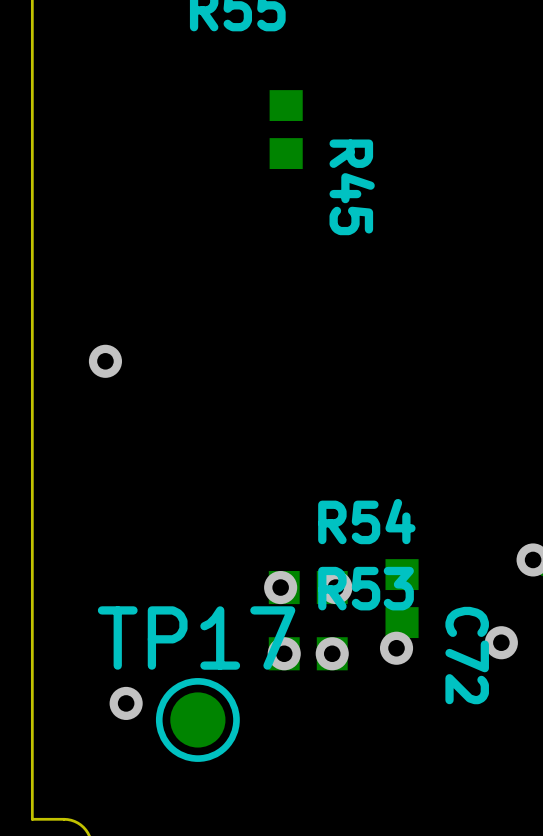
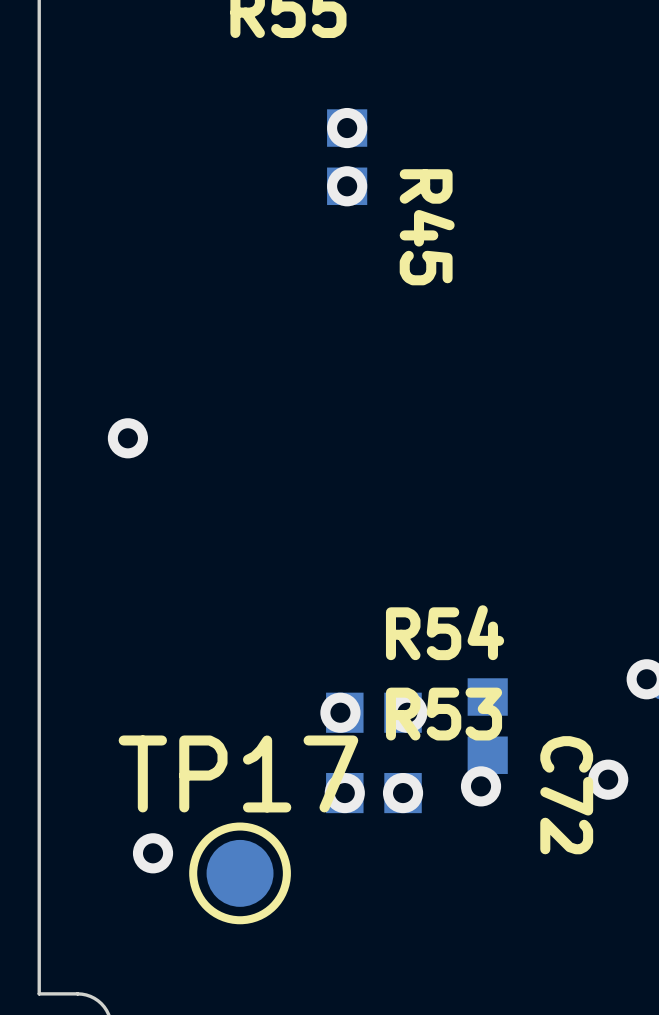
via: none -> (347, 128)
via: none -> (347, 186)

